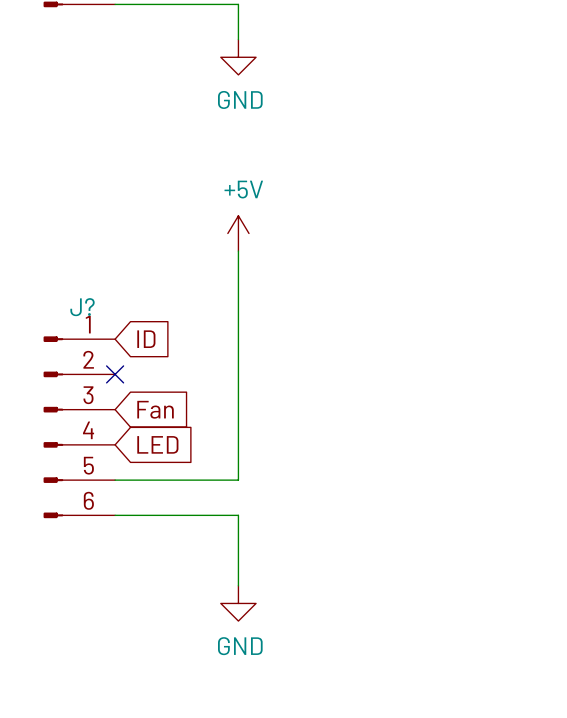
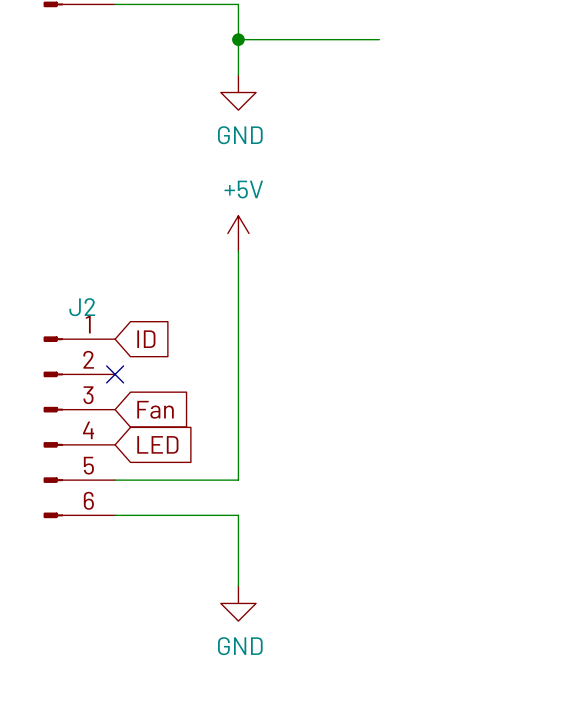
junction: none -> (238, 39)
wire: none -> (379, 39) (238, 39) (238, 74)
power symbol position: GND (238, 57) -> GND (238, 92)
J? name: J? (82, 307) -> J2 (82, 307)

